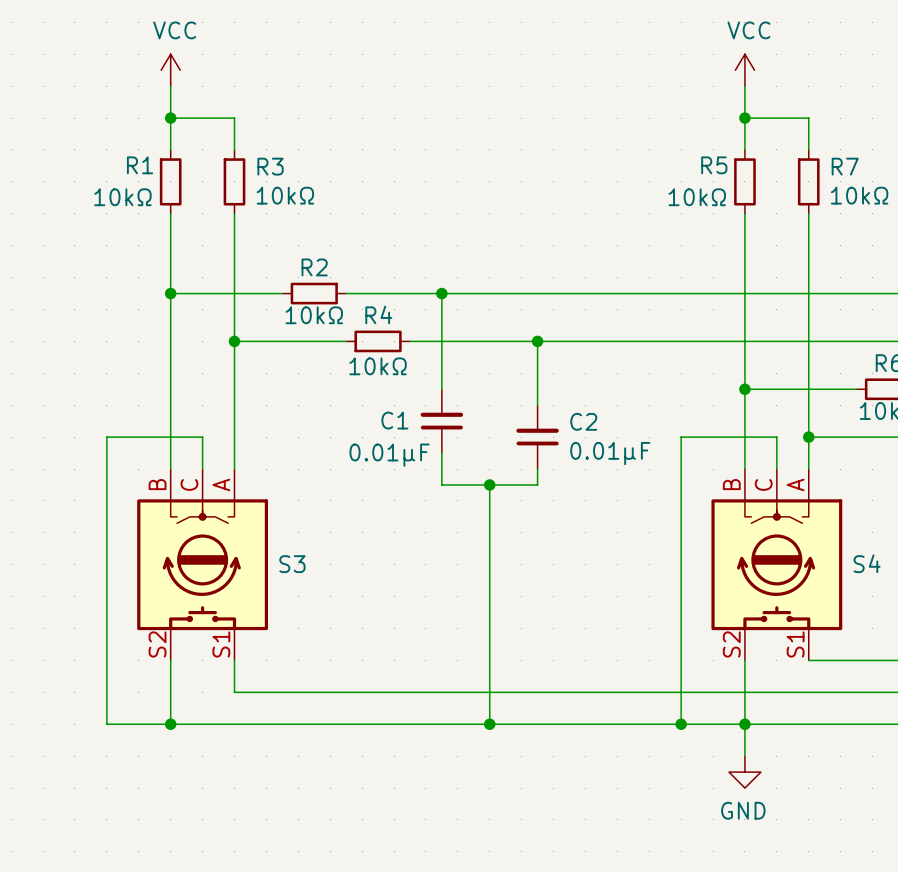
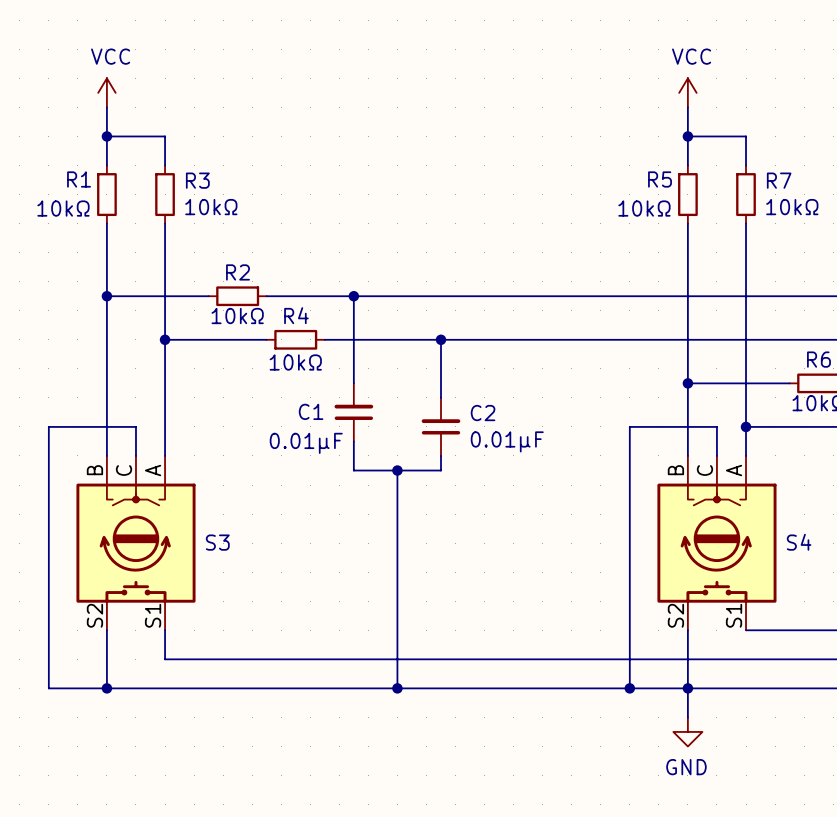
power symbol position: VCC (170, 70) -> VCC (106, 92)
wire: none -> (106, 107) (106, 165)
wire: (170, 86) (170, 118) (234, 118) (234, 149) -> none
wire: none -> (106, 136) (165, 136)
junction position: (170, 118) -> (106, 136)
R1 name: R1 (140, 165) -> R3 (197, 180)
R1: none -> 10kΩ (106, 194)
R3: 10kΩ (234, 181) -> none
R1 value position: 10kΩ (122, 197) -> 10kΩ (211, 207)
wire: none -> (106, 223) (106, 426) (48, 426) (48, 688) (106, 688)
wire: (234, 213) (234, 469) -> none
wire: none -> (106, 296) (165, 296)
junction: none -> (106, 296)
junction: (170, 293) -> none
wire: (218, 293) (282, 293) -> (324, 296) (266, 296)
R2 position: (314, 293) -> (237, 296)
junction: none -> (353, 296)
wire: (441, 293) (441, 389) -> (353, 296) (353, 383)
junction: (441, 293) -> none
wire: none -> (165, 339) (223, 339)
junction: none -> (165, 339)
junction: (234, 341) -> none
wire: (282, 341) (346, 341) -> (382, 339) (324, 339)
R4 position: (378, 341) -> (295, 339)
junction: none -> (441, 339)
wire: (537, 341) (537, 405) -> (441, 339) (441, 397)
junction: (537, 341) -> none
C1 position: (441, 421) -> (353, 412)
wire: (138, 437) (202, 437) (202, 469) -> (135, 426) (135, 455)
C2 position: (537, 437) -> (441, 426)
wire: (441, 453) (441, 484) -> (353, 441) (353, 470) (411, 470)
wire: (537, 469) (537, 484) (473, 484) -> (441, 455) (441, 470)
wire: (489, 484) (489, 724) -> (397, 470) (397, 688)
junction position: (489, 484) -> (397, 470)
S3 position: (202, 564) -> (135, 543)
wire: (234, 660) (234, 692) -> none
wire: (170, 692) (170, 724) -> (165, 659) (223, 659)
junction position: (170, 724) -> (106, 688)
junction position: (489, 724) -> (397, 688)

